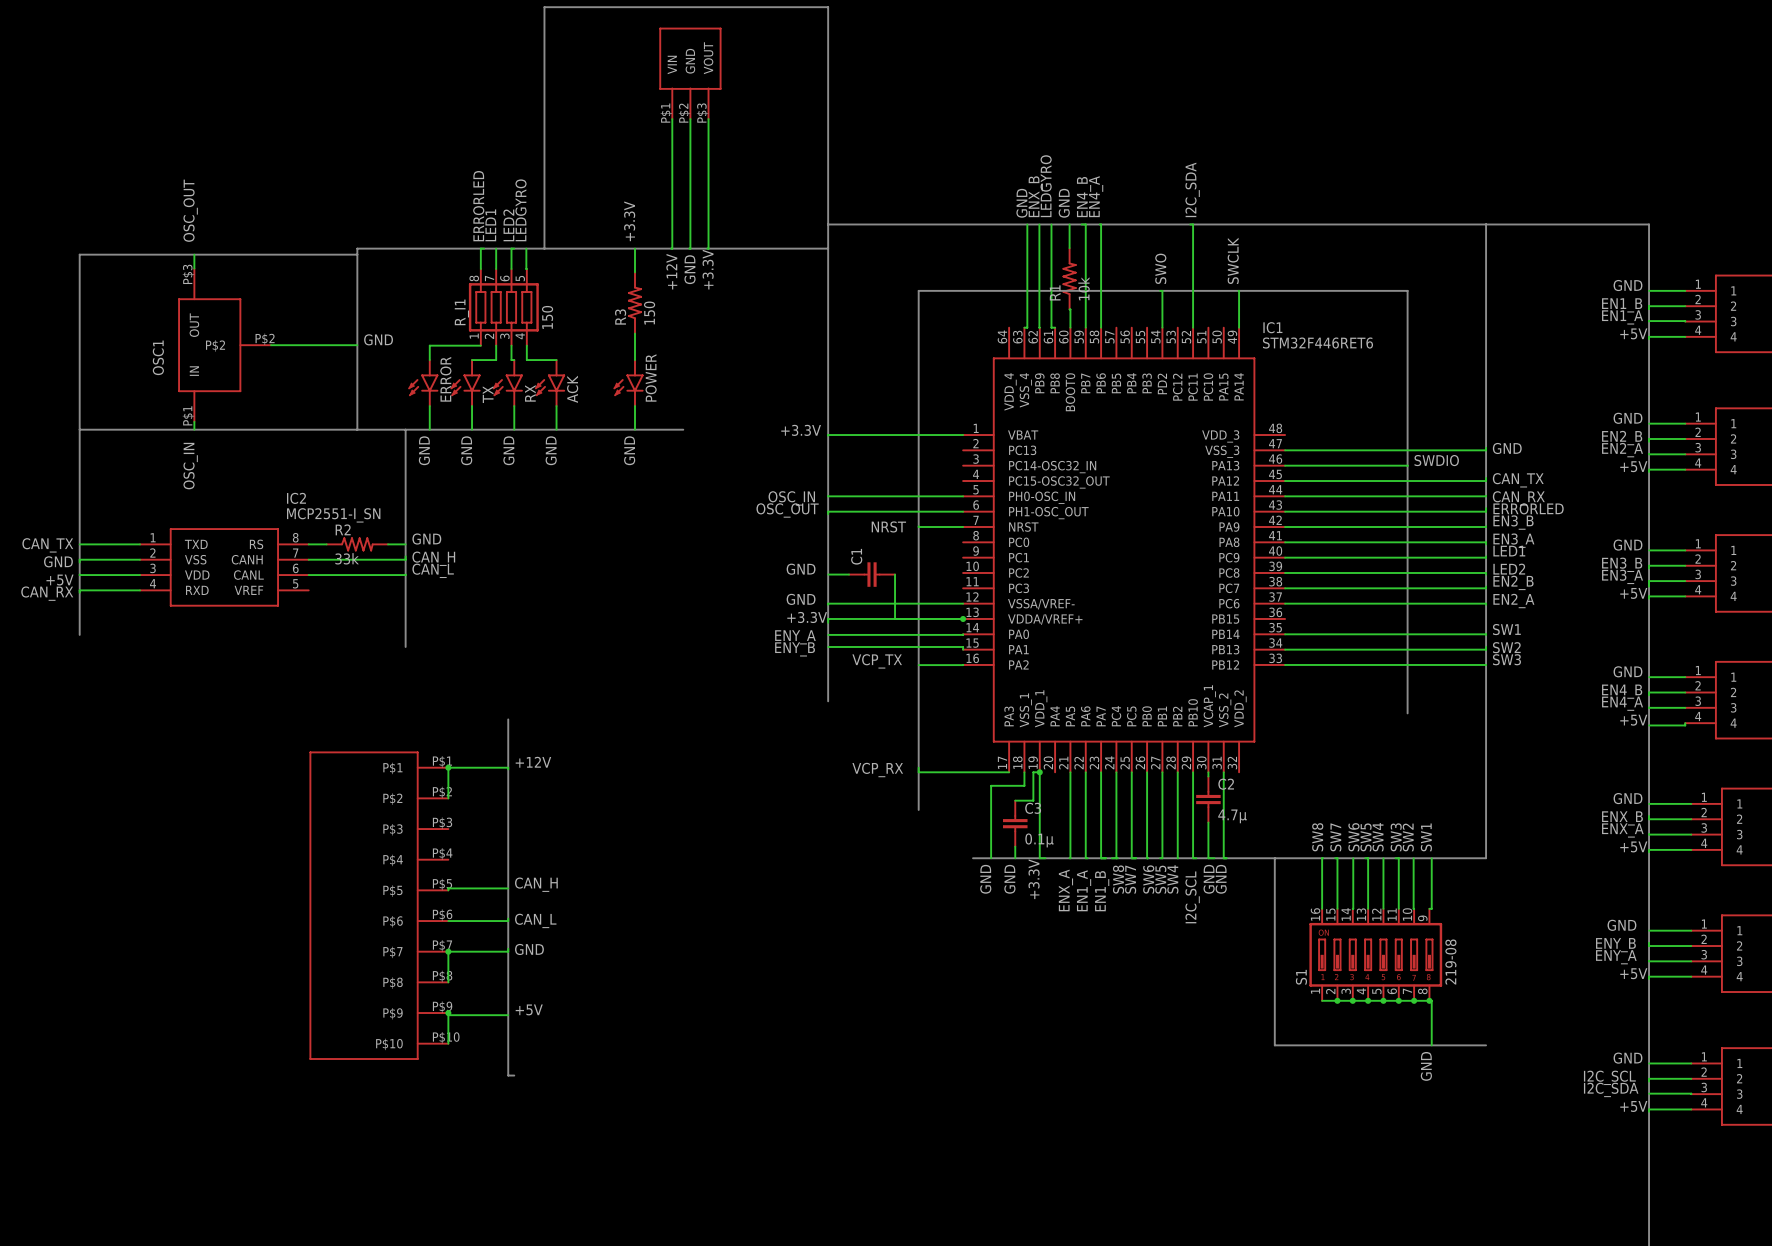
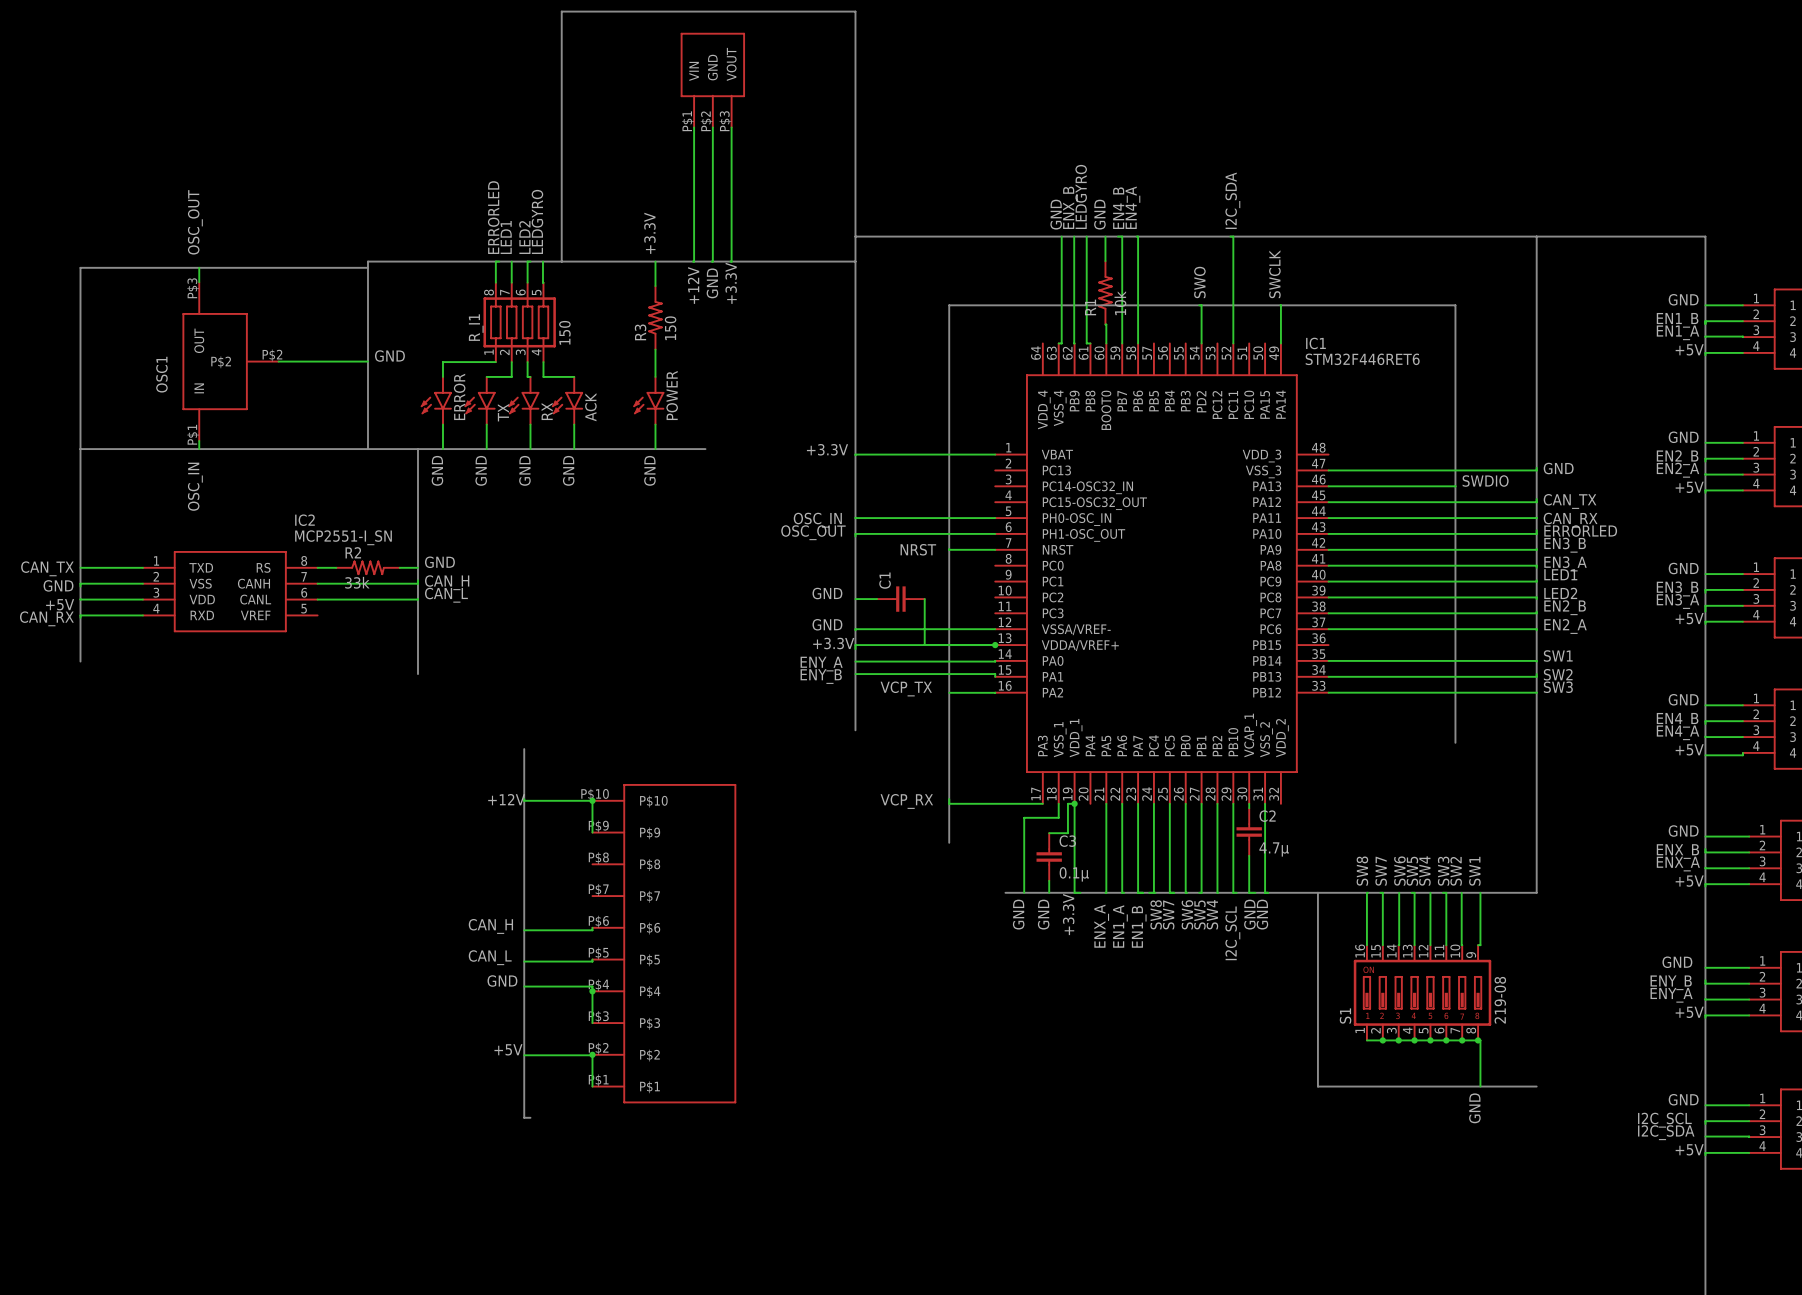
label position: +12V (533, 762) -> +12V (506, 799)
junction: (448, 767) -> none
wire: (508, 767) (448, 767) (448, 798) -> none
wire: none -> (524, 800) (592, 800) (592, 832)
junction: none -> (592, 800)
label position: CAN_H (536, 884) -> CAN_H (490, 926)
wire: (508, 888) (448, 888) (448, 890) -> none
wire: none -> (592, 927) (592, 930) (524, 930)
part: (378, 905) -> none
part: none -> (664, 943)
wire: (508, 918) (508, 921) (448, 921) -> none
label position: CAN_L (535, 920) -> CAN_L (490, 957)
wire: none -> (592, 959) (592, 961) (524, 961)
wire: (508, 948) (508, 951) (448, 951) (448, 982) -> (524, 986) (592, 986) (592, 1023)
label position: GND (529, 949) -> GND (502, 981)
junction: (448, 951) -> none
junction: none -> (592, 991)
label position: +5V (529, 1009) -> +5V (508, 1049)
wire: (448, 1013) (448, 1043) -> (592, 1054) (592, 1086)
junction: (448, 1013) -> none
junction: none -> (592, 1054)
wire: (448, 1015) (508, 1015) -> (592, 1055) (524, 1055)

